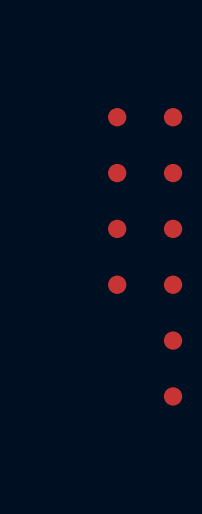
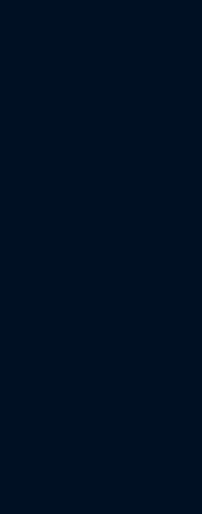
part: (117, 117) -> none
part: (173, 117) -> none
part: (117, 173) -> none
part: (173, 173) -> none
part: (117, 228) -> none
part: (173, 228) -> none
part: (117, 284) -> none
part: (173, 284) -> none
part: (173, 340) -> none
part: (173, 396) -> none

